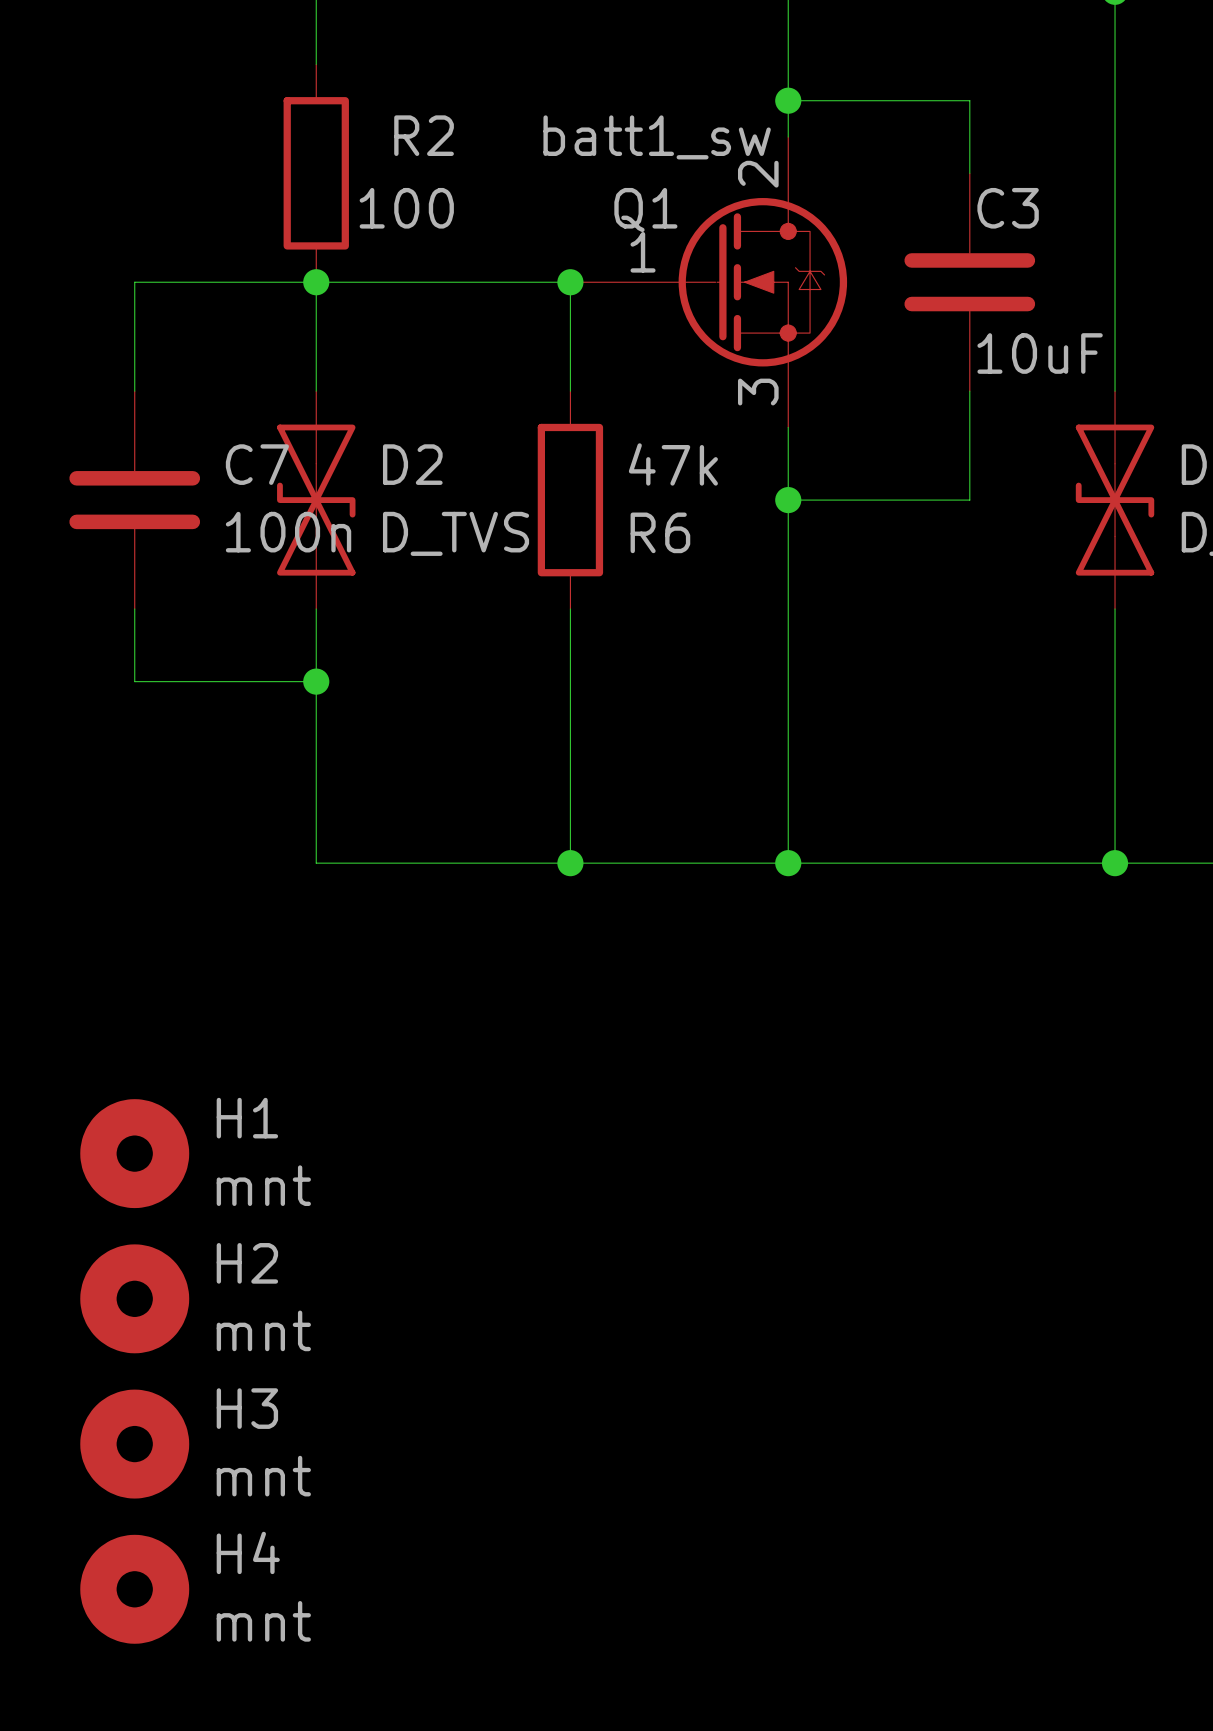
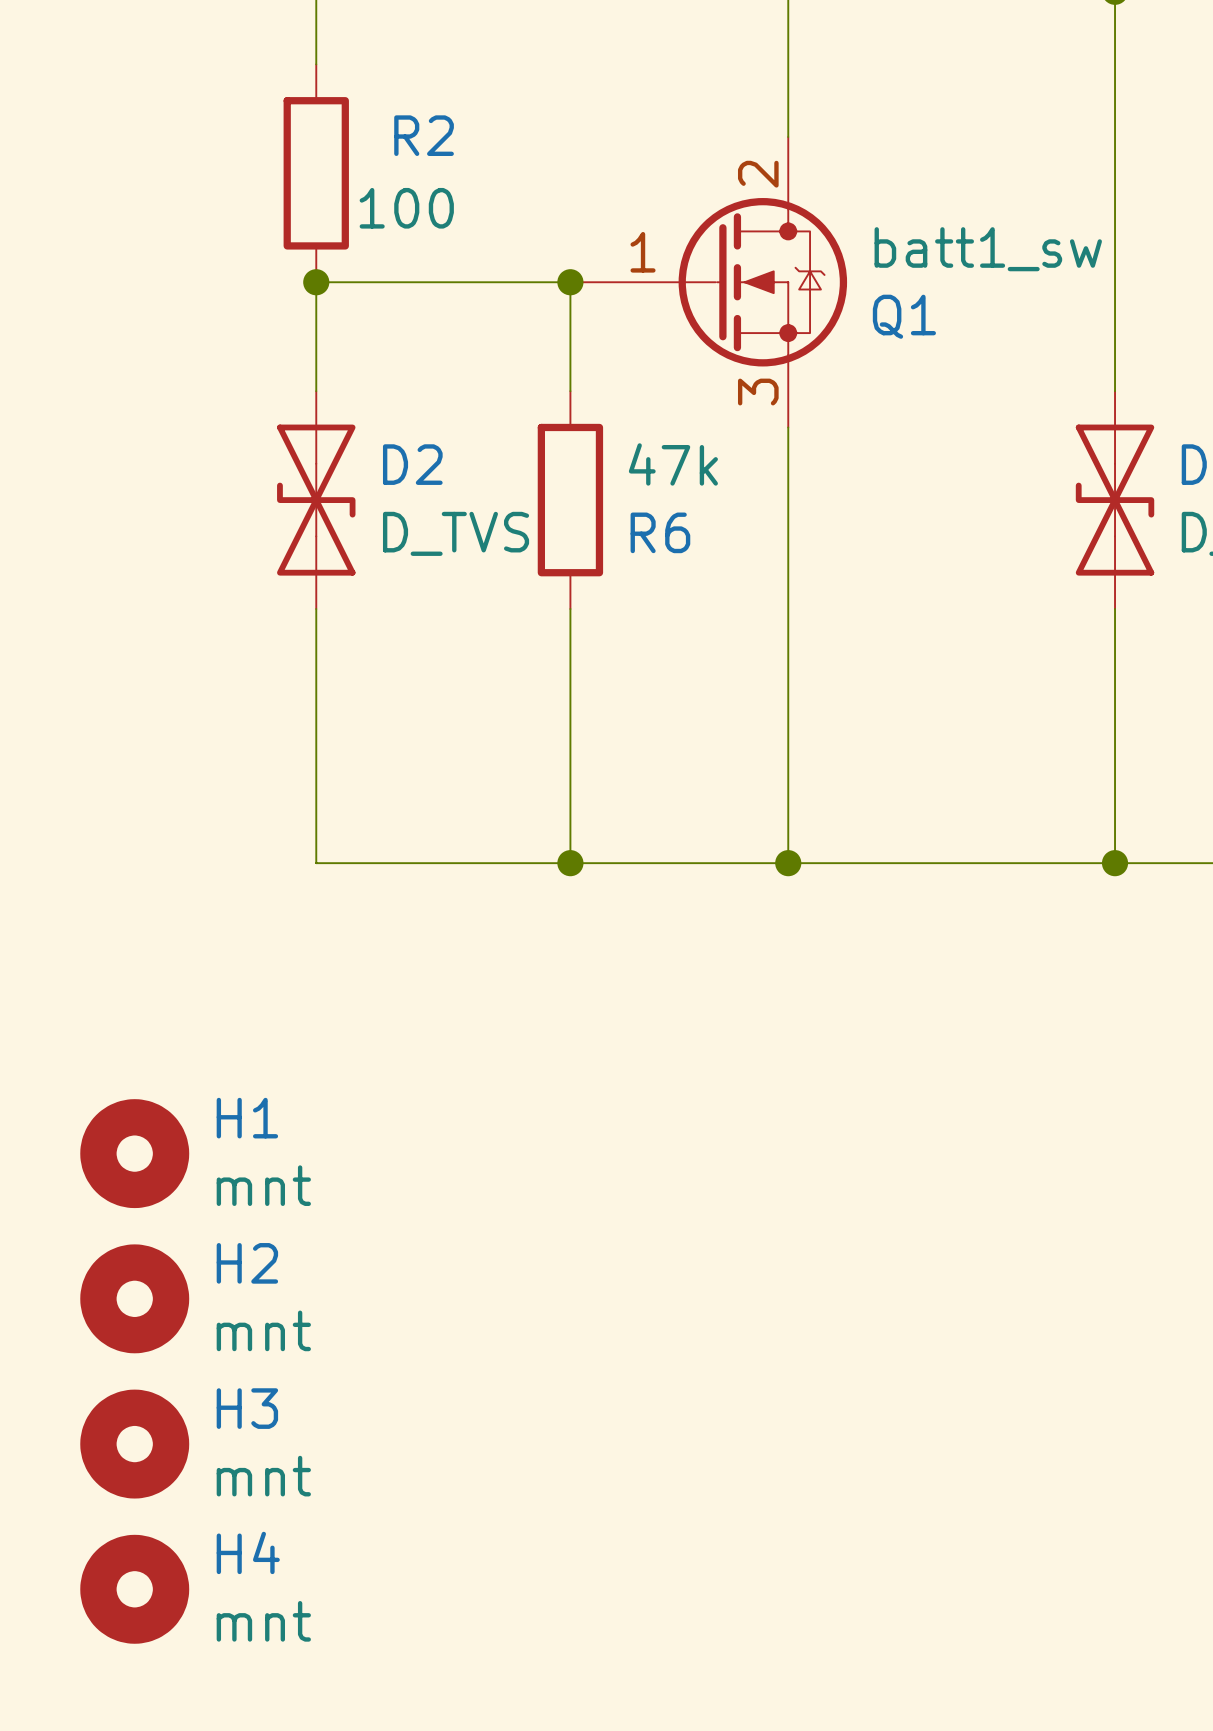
wire: (788, 100) (969, 100) (969, 173) -> none
junction: (788, 100) -> none
Q1 value position: batt1_sw (657, 137) -> batt1_sw (988, 249)
Q1 name position: Q1 (645, 210) -> Q1 (904, 316)
wire: (316, 282) (134, 282) (134, 391) -> none
C3: 10uF (969, 282) -> none
wire: (969, 391) (969, 500) (788, 500) -> none
C7: 100n (134, 500) -> none
junction: (788, 500) -> none
wire: (134, 609) (134, 681) (316, 681) -> none
junction: (316, 681) -> none

